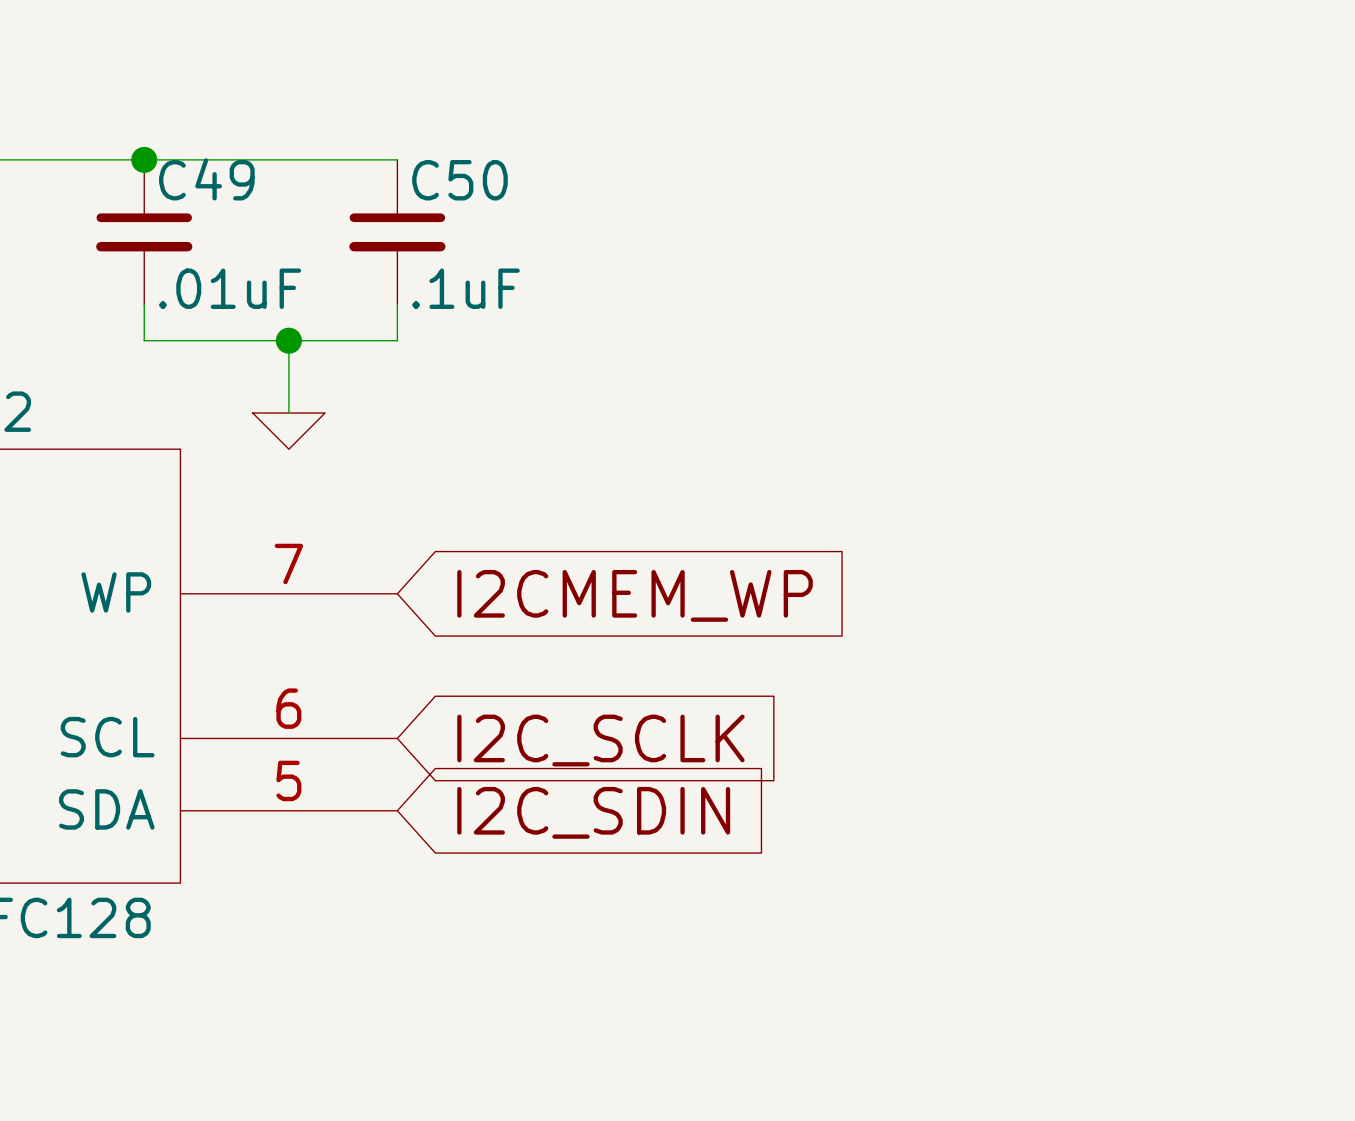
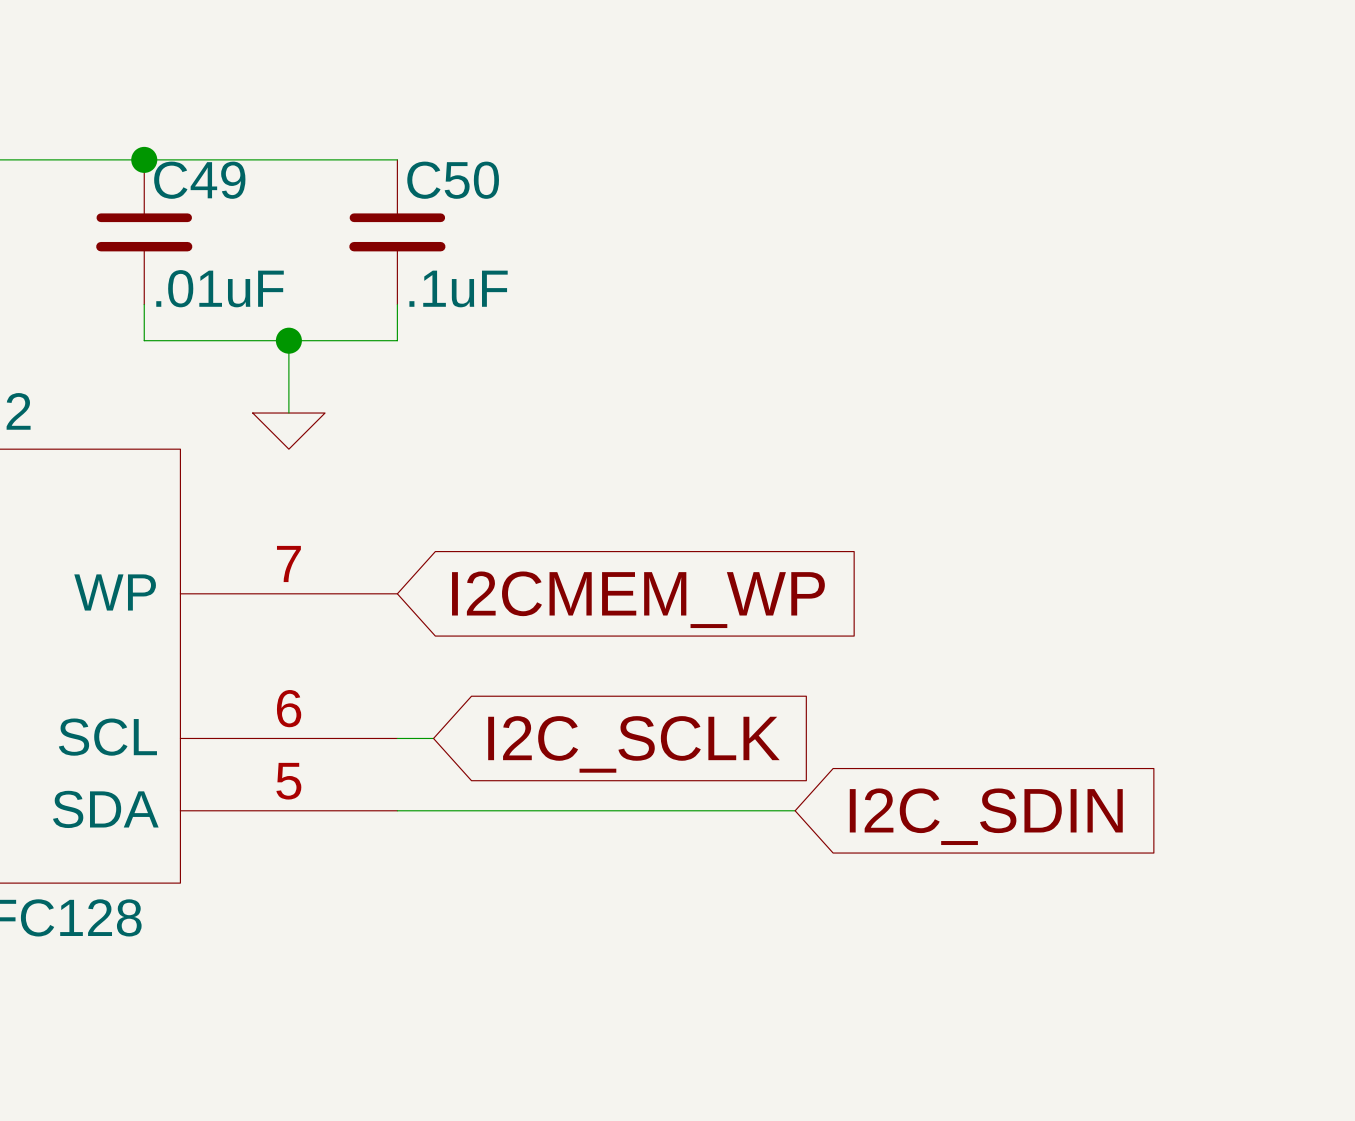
wire: none -> (397, 738) (433, 738)
global label position: I2C_SCLK (600, 740) -> I2C_SCLK (633, 744)
wire: none -> (397, 810) (795, 810)
global label position: I2C_SDIN (593, 812) -> I2C_SDIN (986, 816)

